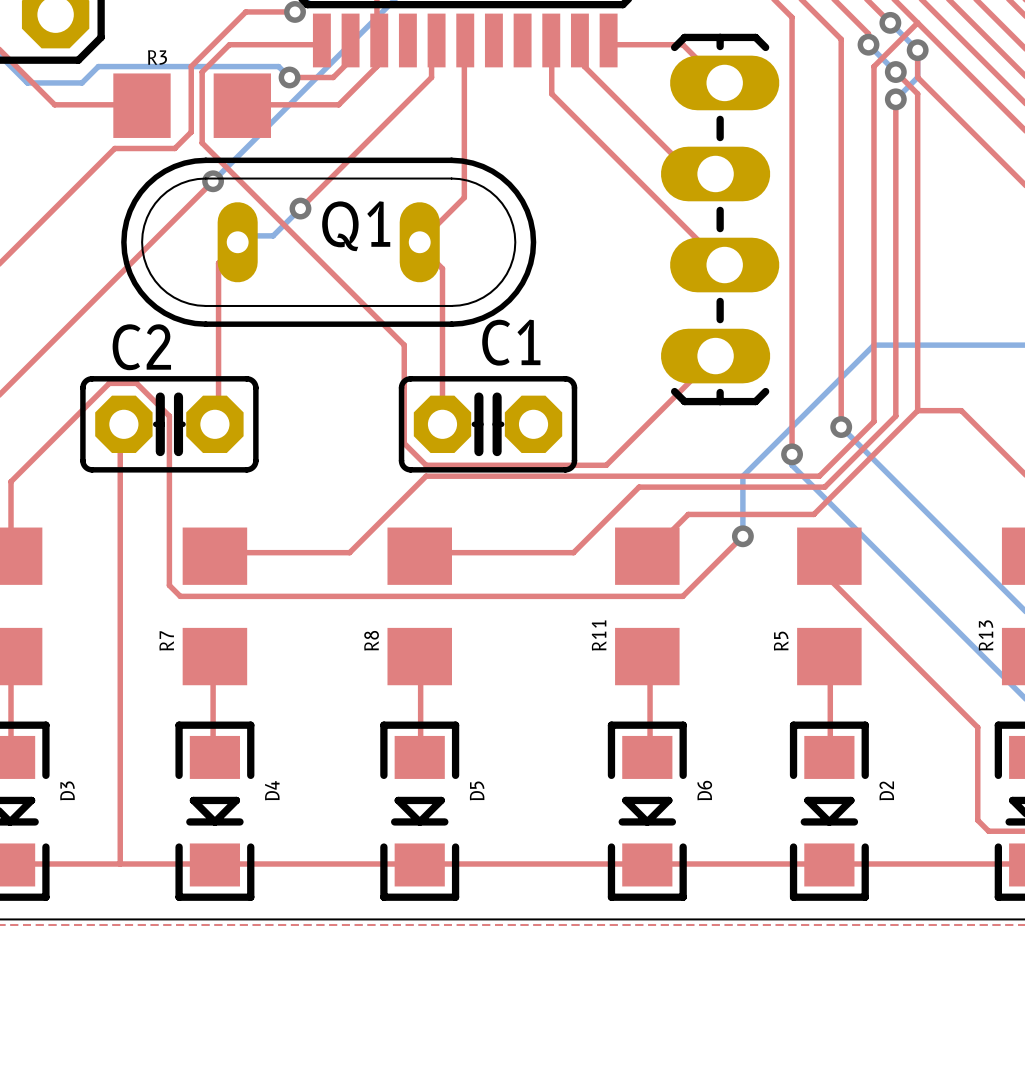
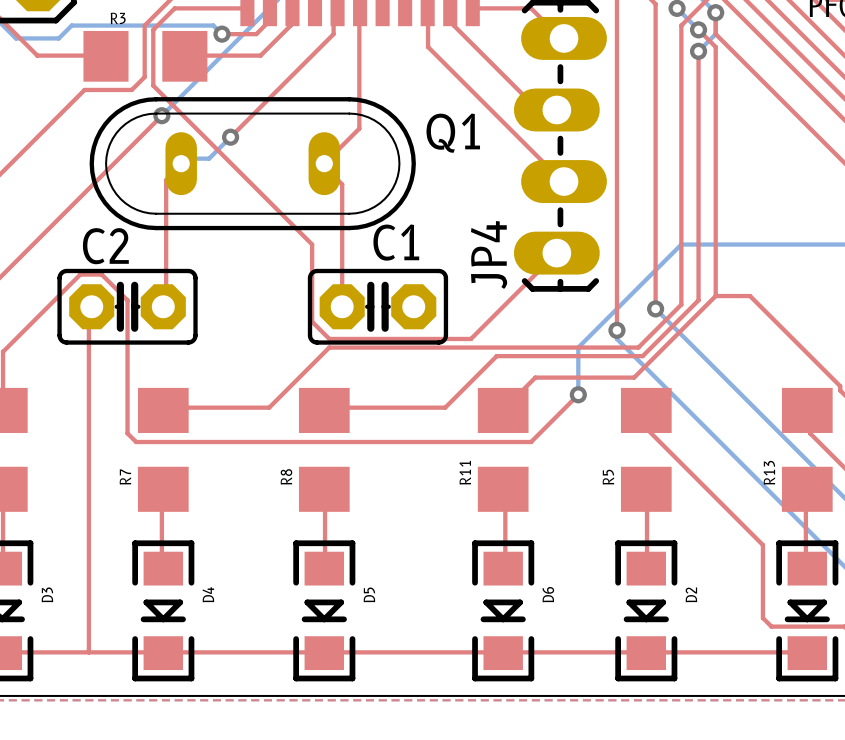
Q1 name position: Q1 (356, 226) -> Q1 (453, 133)
JP4 name: none -> JP4 (489, 254)

